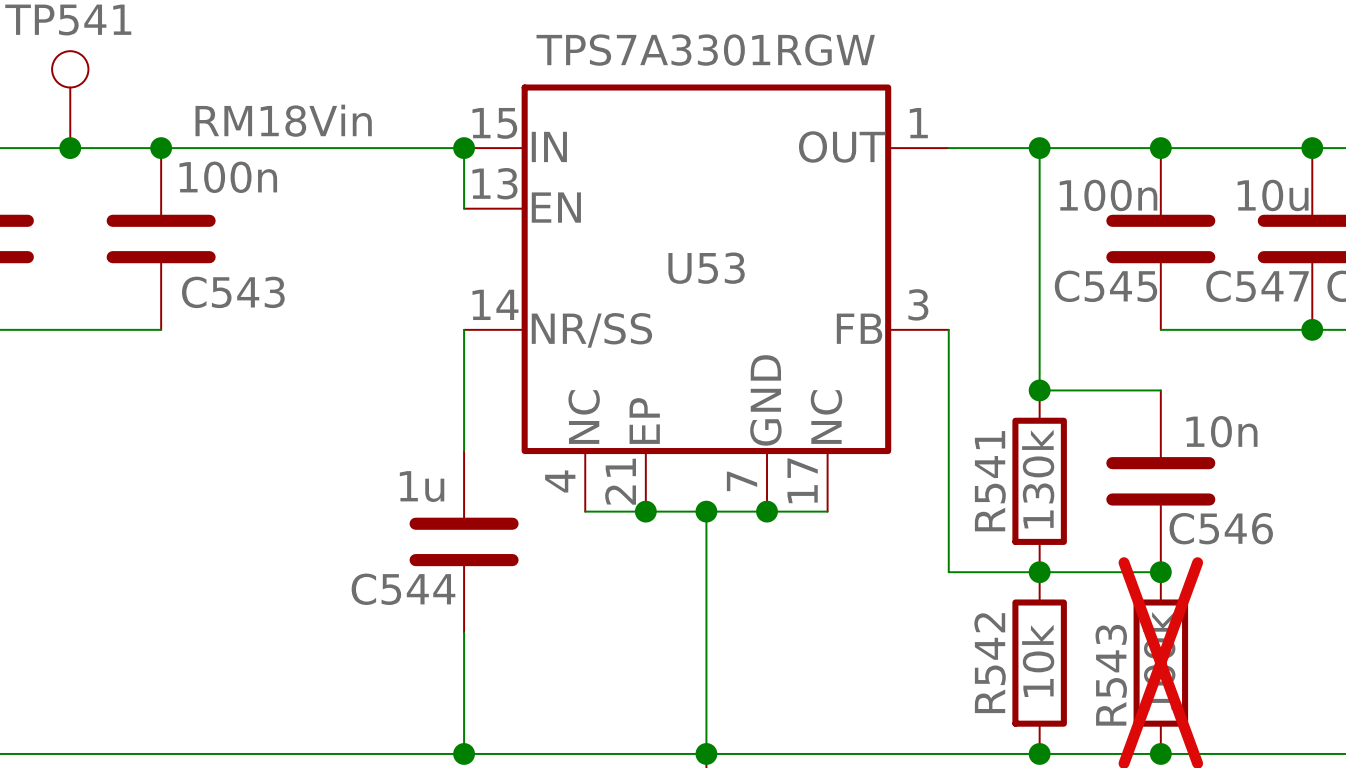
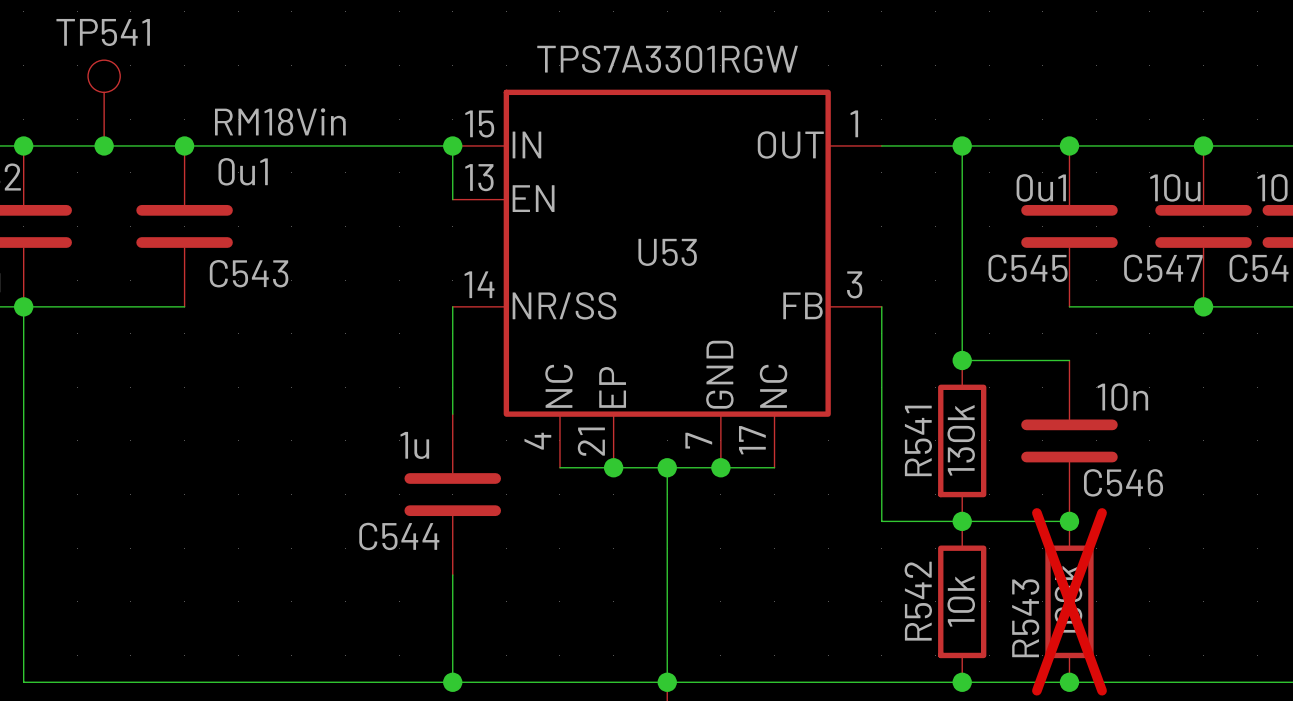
C543 value: 100n (228, 177) -> 0u1 (243, 171)
C545 value: 100n (1108, 195) -> 0u1 (1041, 187)

